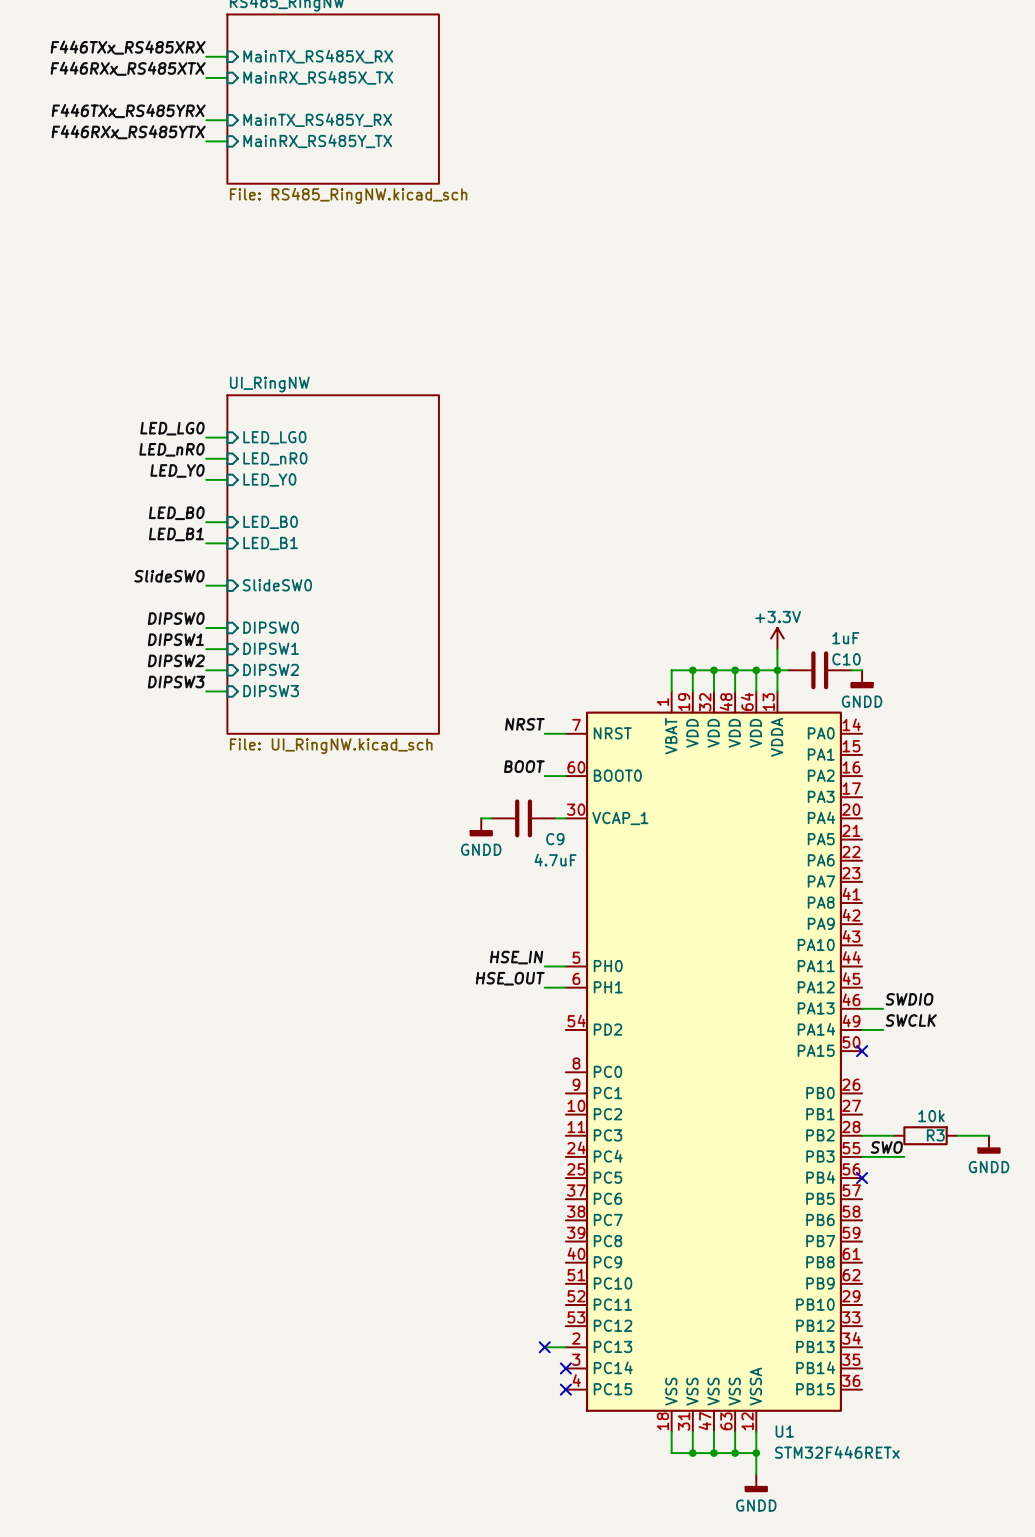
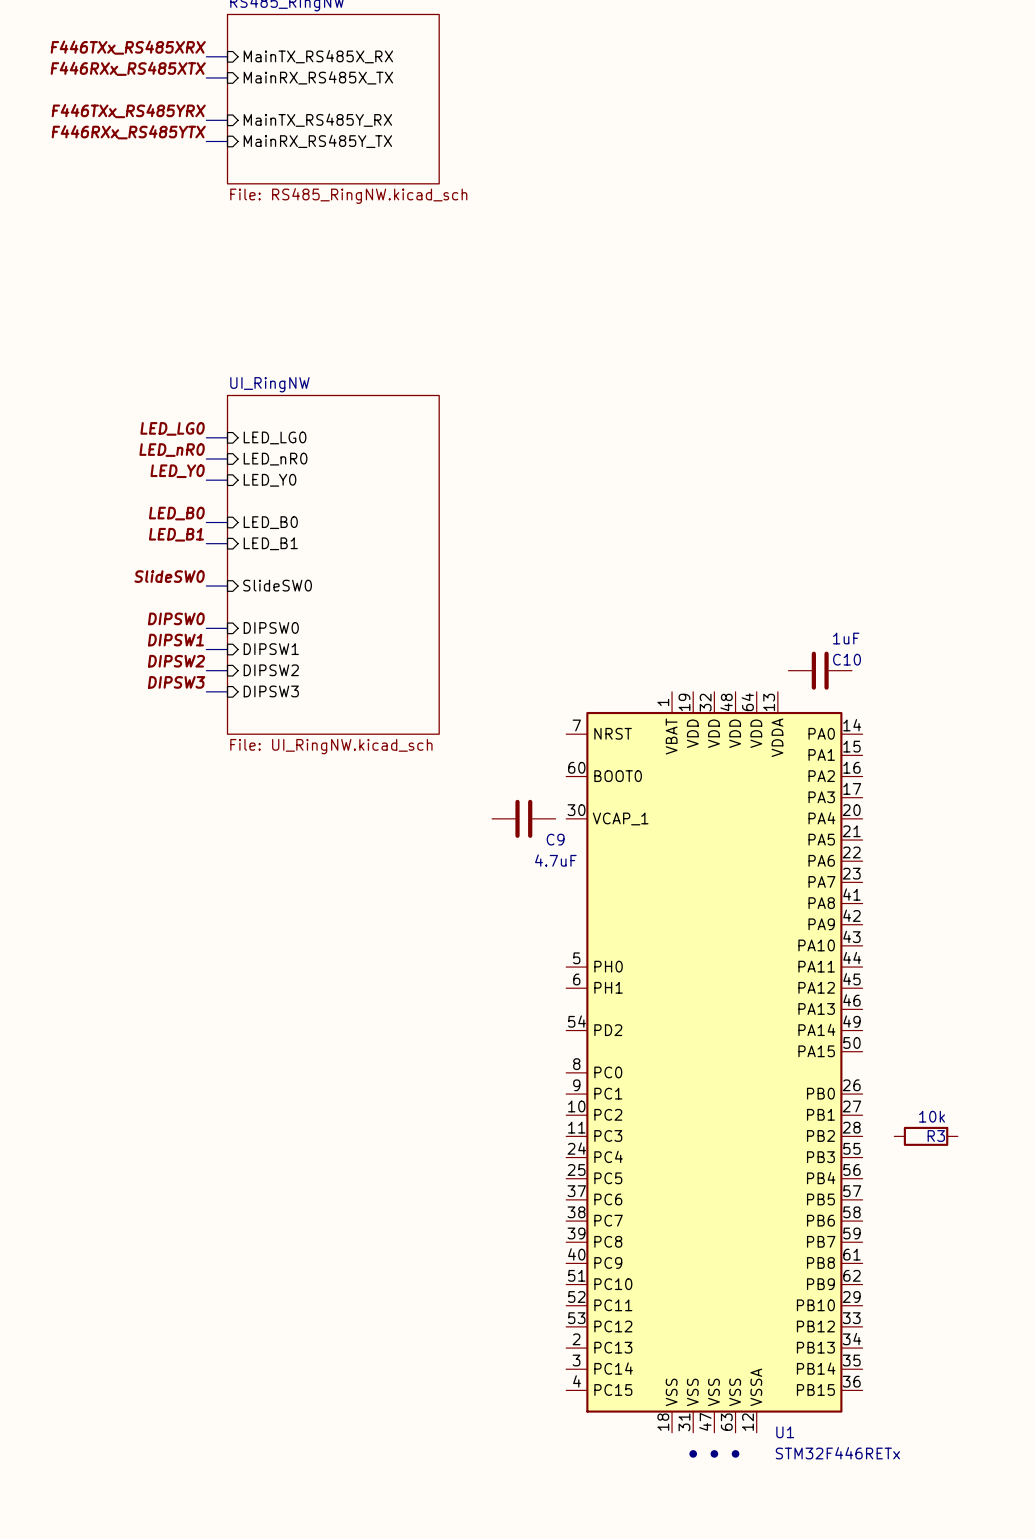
power symbol: +3.3V (777, 638) -> none
wire: (777, 649) (777, 691) -> none
wire: (692, 670) (692, 691) -> none
junction: (692, 670) -> none
wire: (713, 670) (713, 691) -> none
junction: (713, 670) -> none
wire: (735, 670) (735, 691) -> none
junction: (735, 670) -> none
wire: (756, 670) (756, 691) -> none
junction: (756, 670) -> none
junction: (777, 670) -> none
wire: (788, 670) (671, 670) (671, 691) -> none
wire: (851, 670) (862, 670) -> none
power symbol: GNDD (862, 679) -> none
label: NRST (524, 724) -> none
wire: (544, 733) (565, 733) -> none
label: BOOT (524, 766) -> none
wire: (544, 776) (565, 776) -> none
wire: (481, 818) (491, 818) -> none
wire: (555, 818) (565, 818) -> none
power symbol: GNDD (481, 827) -> none
label: HSE_IN (516, 957) -> none
wire: (544, 966) (565, 966) -> none
label: HSE_OUT (510, 978) -> none
wire: (544, 987) (565, 987) -> none
label: SWDIO (909, 999) -> none
wire: (862, 1008) (883, 1008) -> none
label: SWCLK (911, 1020) -> none
wire: (862, 1029) (883, 1029) -> none
no-connect mark: (862, 1051) -> none
wire: (862, 1135) (893, 1135) -> none
wire: (957, 1135) (989, 1135) -> none
power symbol: GNDD (989, 1144) -> none
label: SWO (886, 1147) -> none
wire: (862, 1156) (904, 1156) -> none
no-connect mark: (862, 1178) -> none
wire: (544, 1347) (565, 1347) -> none
no-connect mark: (544, 1347) -> none
no-connect mark: (565, 1368) -> none
no-connect mark: (565, 1389) -> none
wire: (671, 1431) (671, 1453) (756, 1453) -> none
wire: (692, 1431) (692, 1453) -> none
wire: (713, 1431) (713, 1453) -> none
wire: (735, 1431) (735, 1453) -> none
wire: (756, 1431) (756, 1474) -> none
junction: (756, 1453) -> none
power symbol: GNDD (756, 1483) -> none

